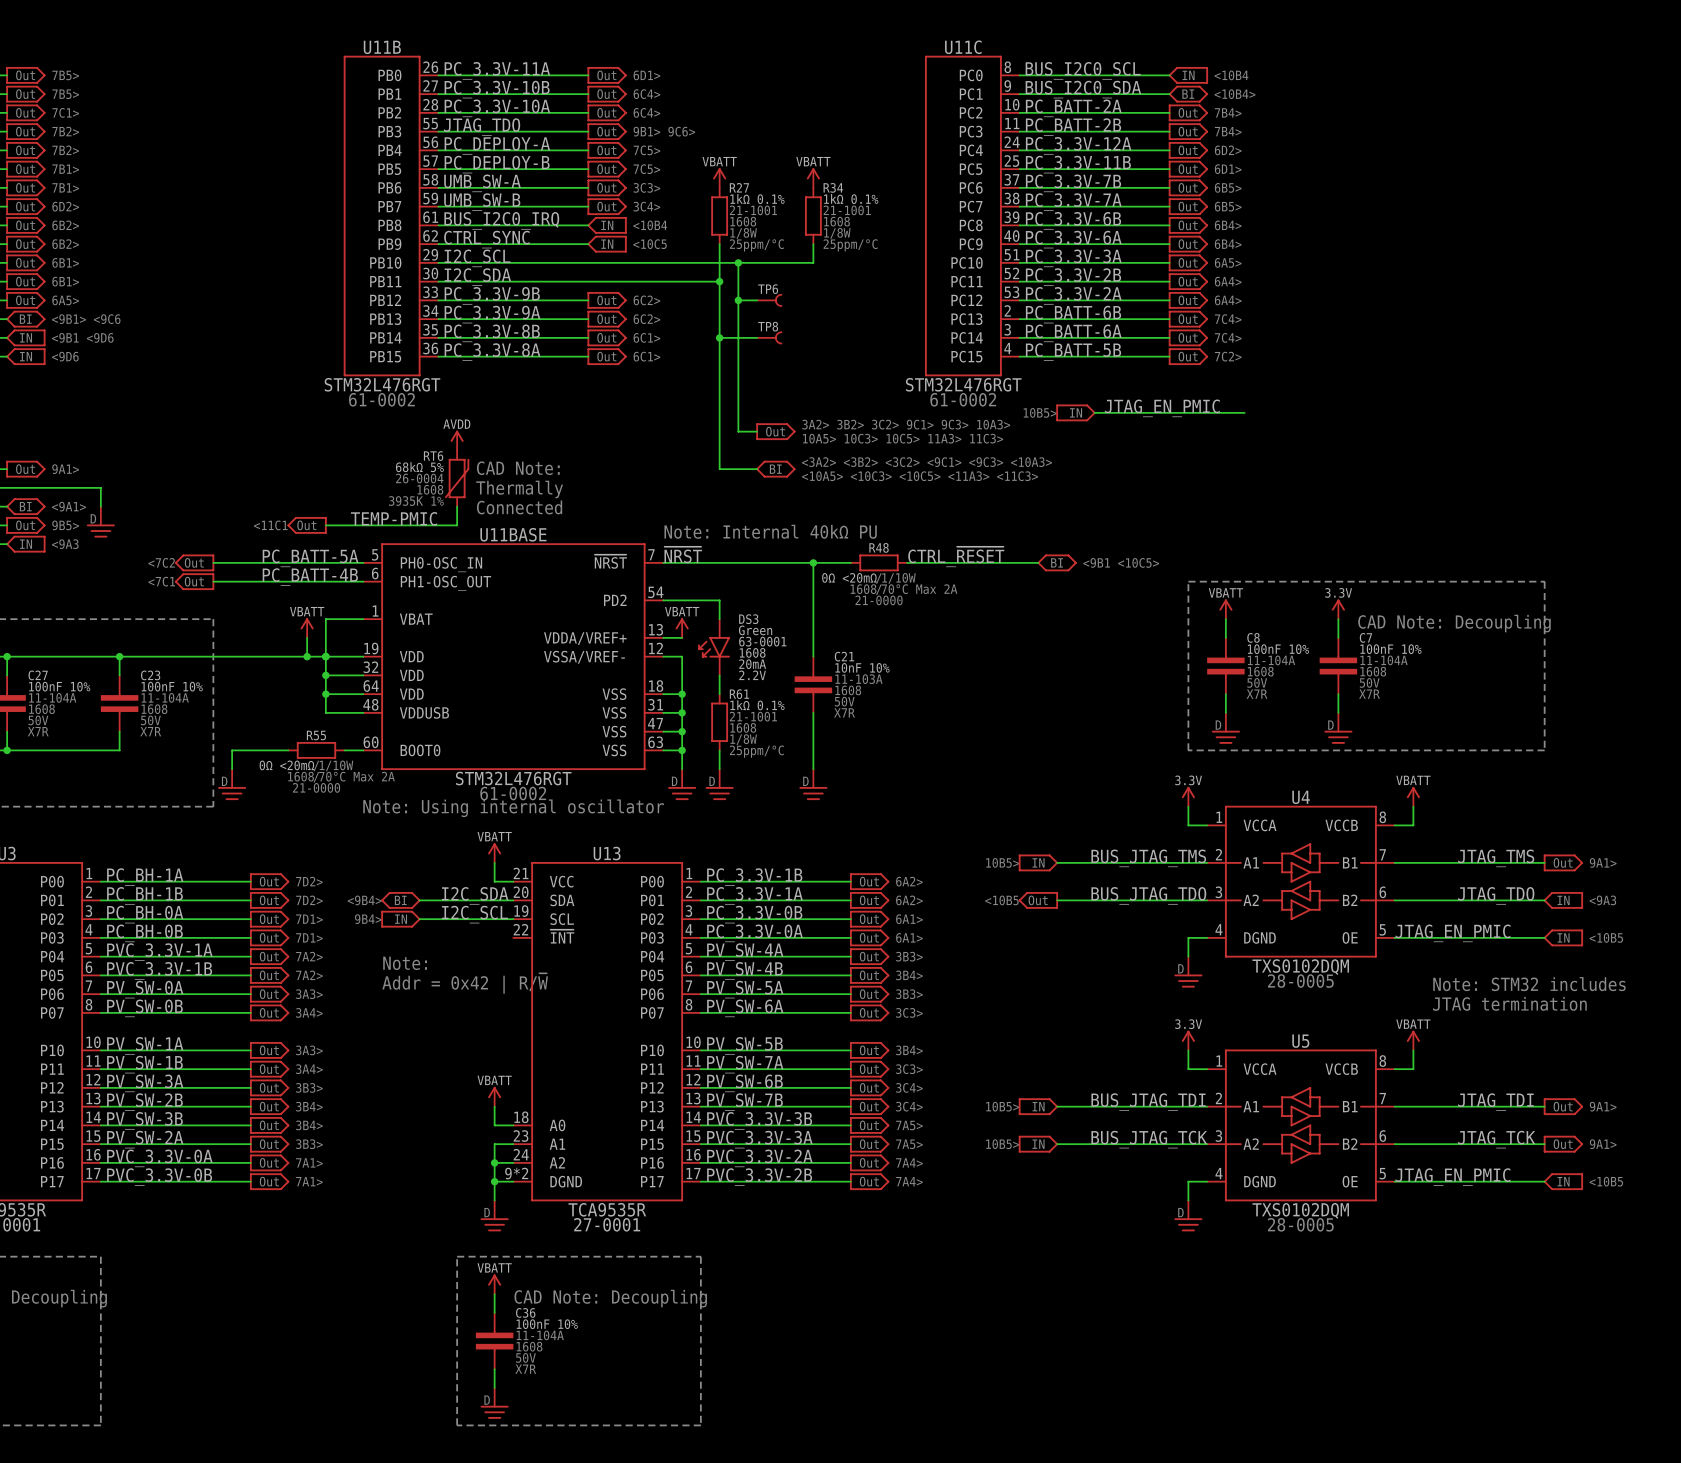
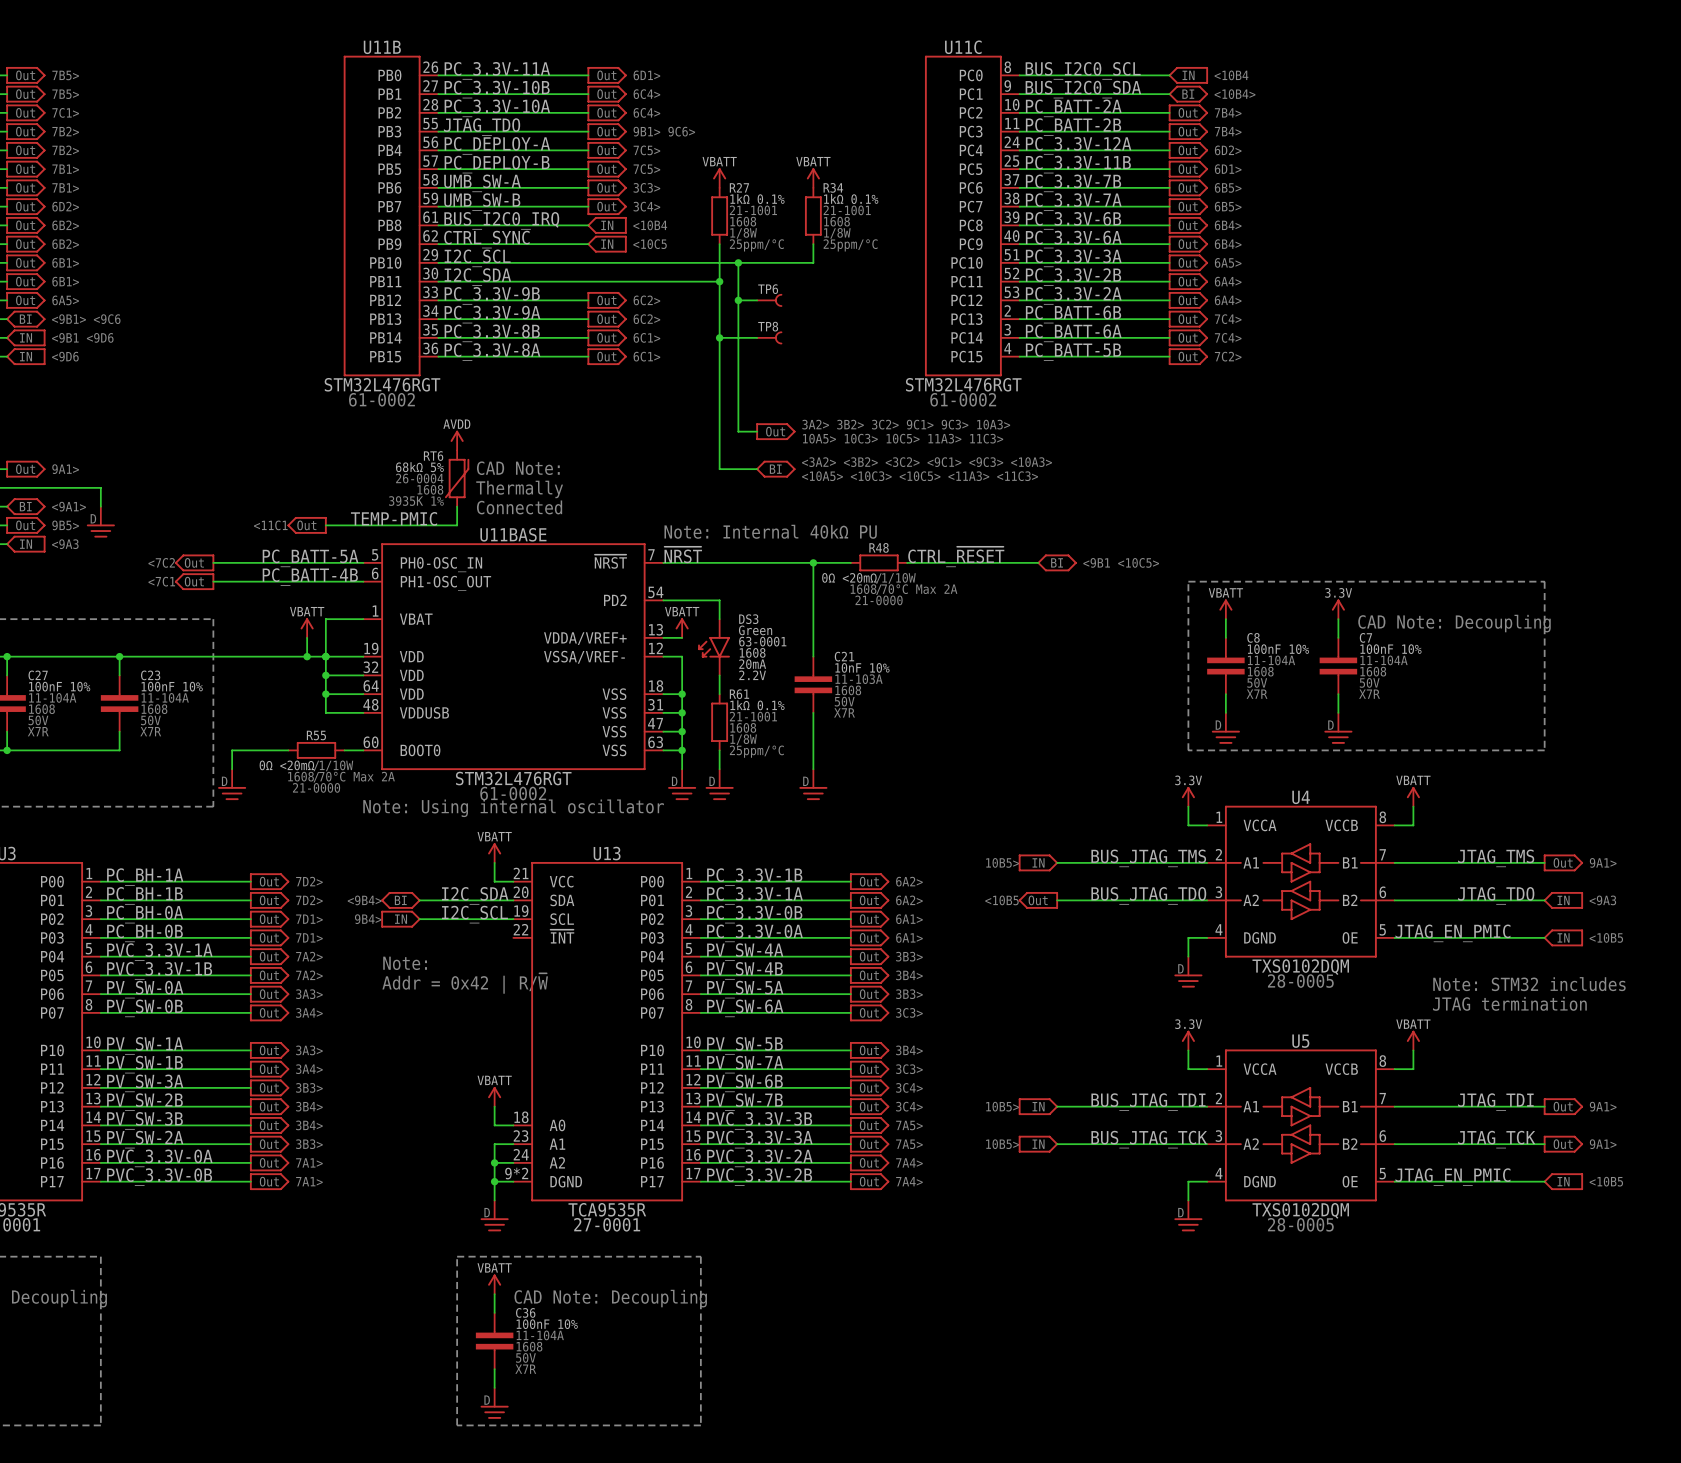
label: JTAG_EN_PMIC (1162, 408) -> none
text: 10B5> (1040, 412) -> none
part: (1075, 412) -> none
wire: (1094, 412) (1244, 412) -> none

